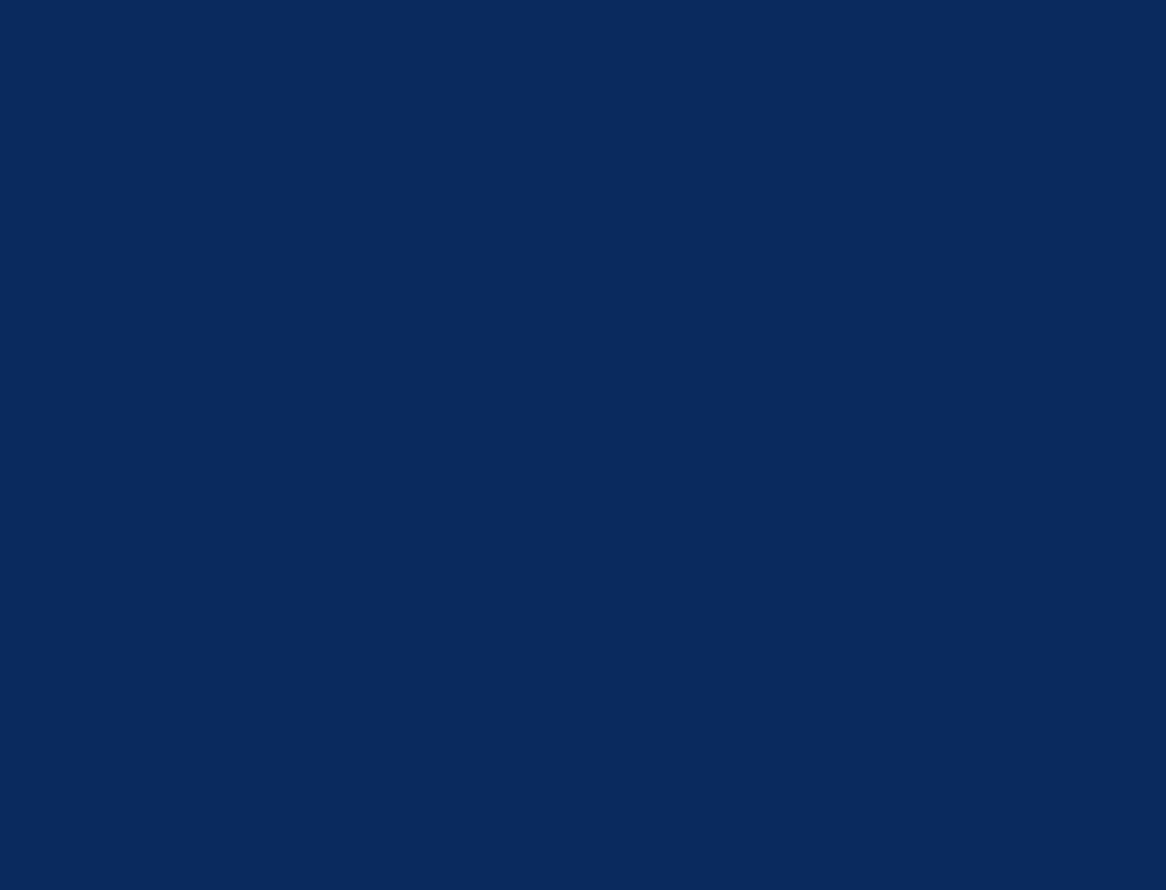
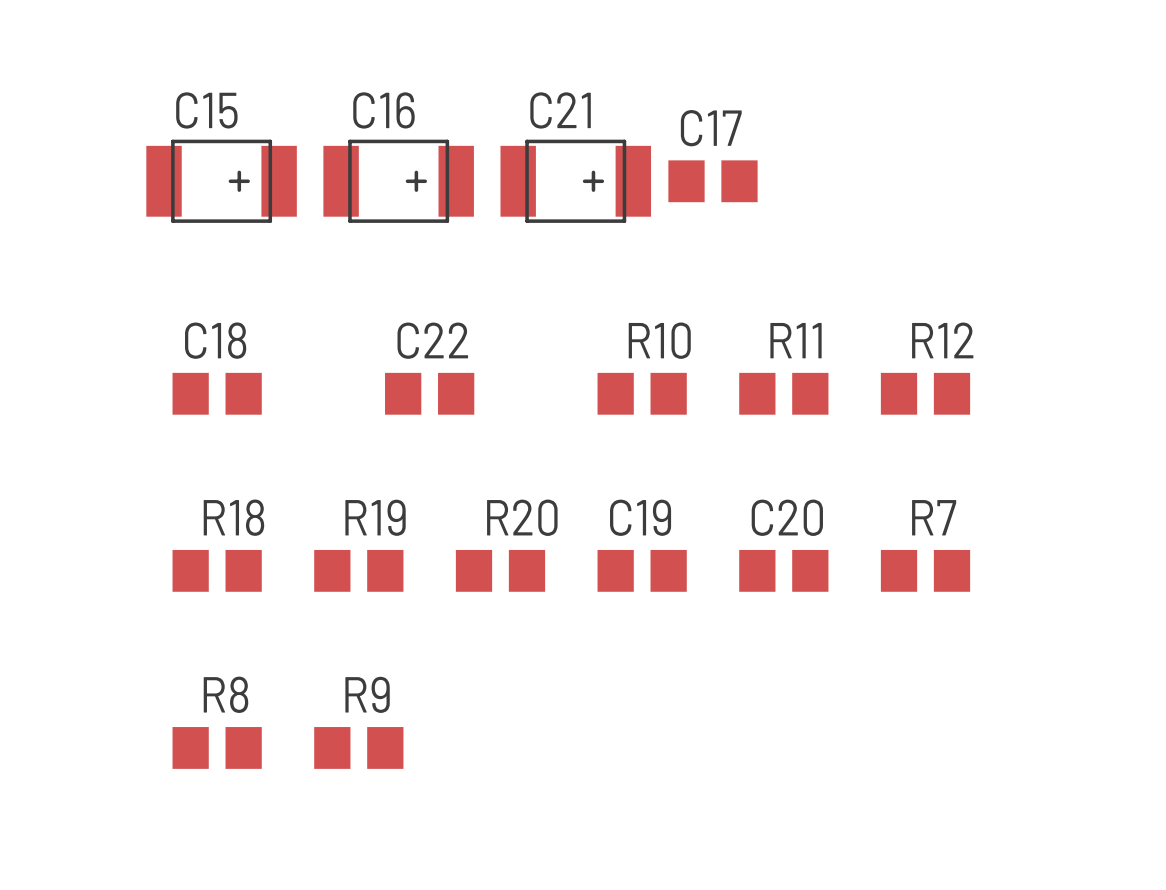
C15: none -> (221, 181)
C16: none -> (398, 181)
C21: none -> (575, 181)
C17: none -> (712, 181)
C18: none -> (217, 393)
C22: none -> (429, 393)
R10: none -> (642, 393)
R11: none -> (783, 393)
R12: none -> (925, 393)
R18: none -> (217, 570)
R19: none -> (358, 570)
R20: none -> (500, 570)
C19: none -> (642, 570)
C20: none -> (783, 570)
R7: none -> (925, 570)
R8: none -> (217, 747)
R9: none -> (358, 747)

